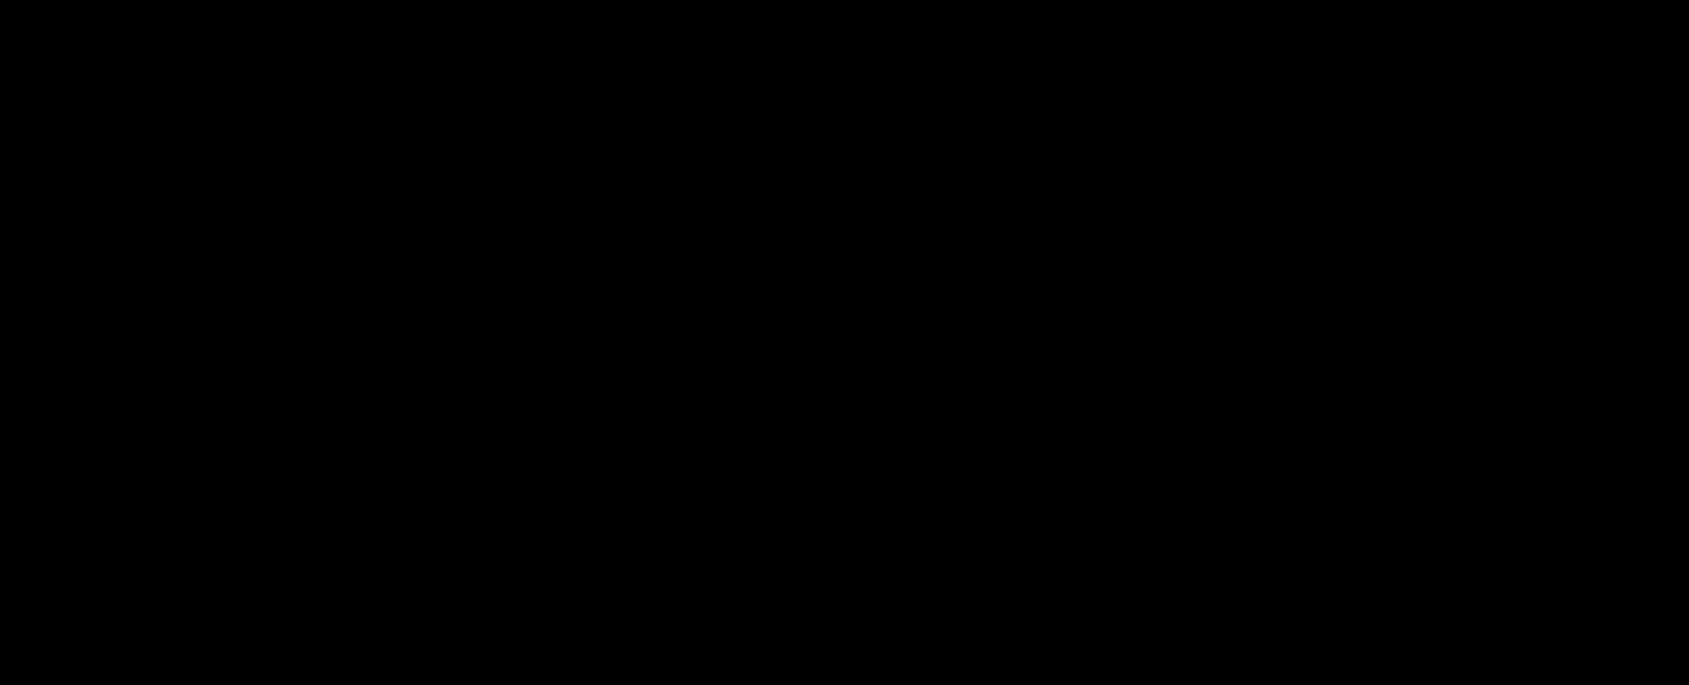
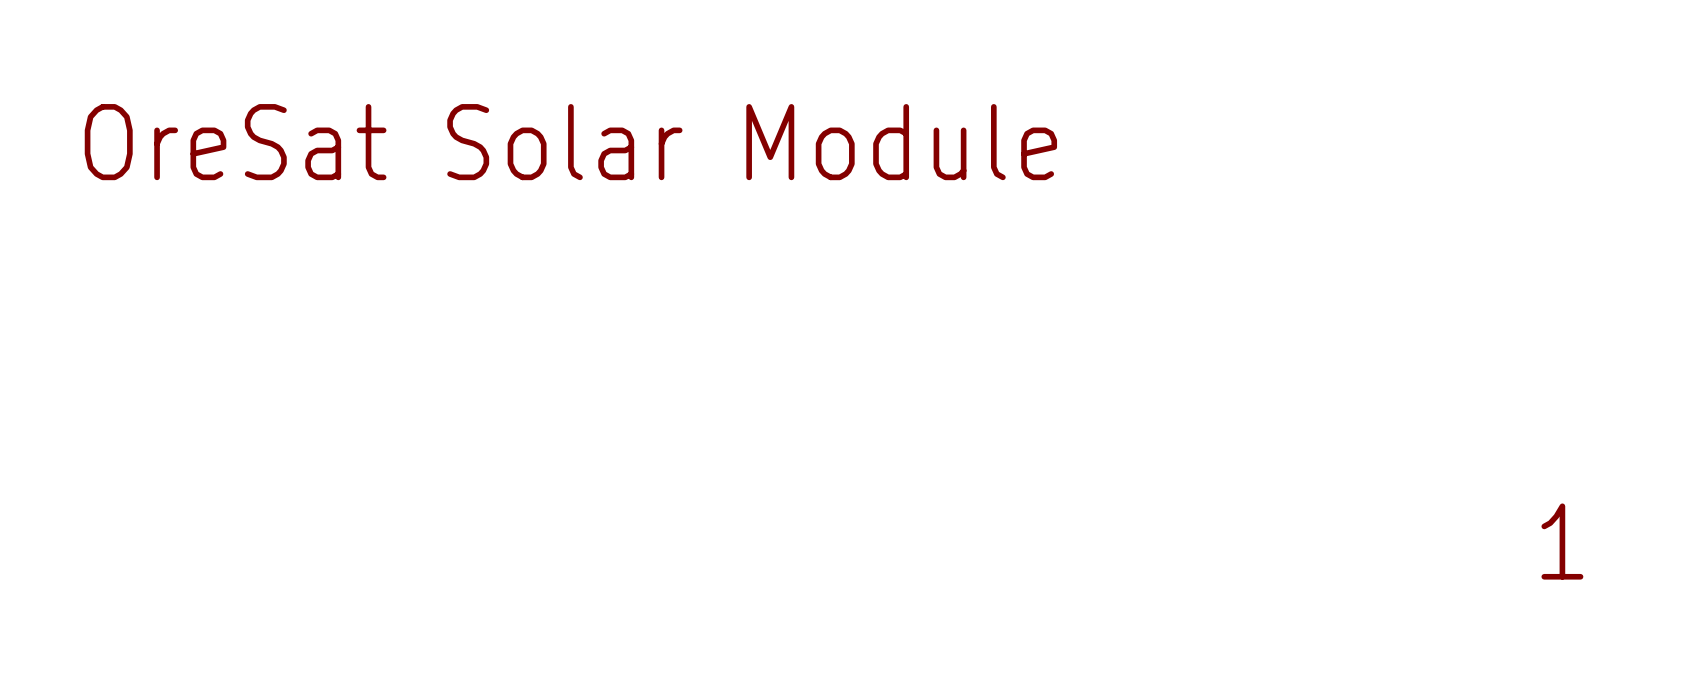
text: none -> OreSat Solar Module (570, 142)
text: none -> 1 (1562, 541)

